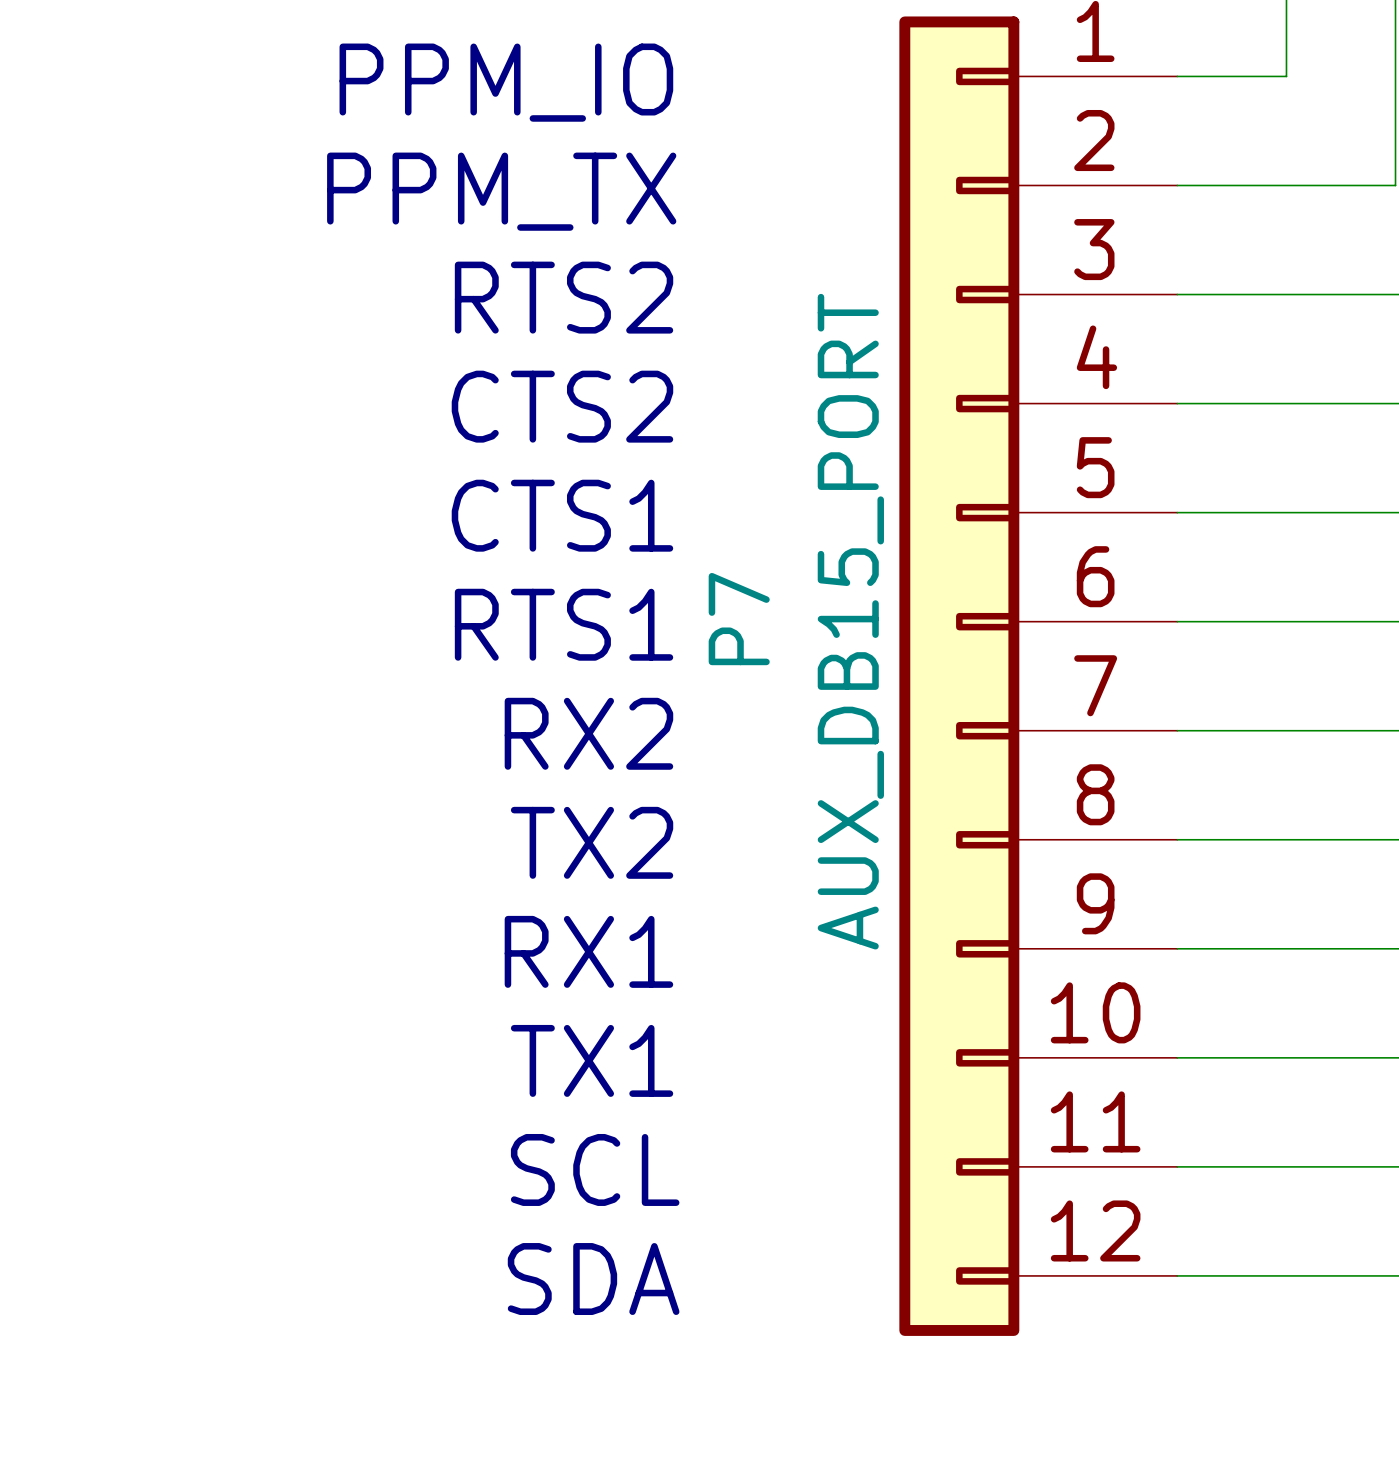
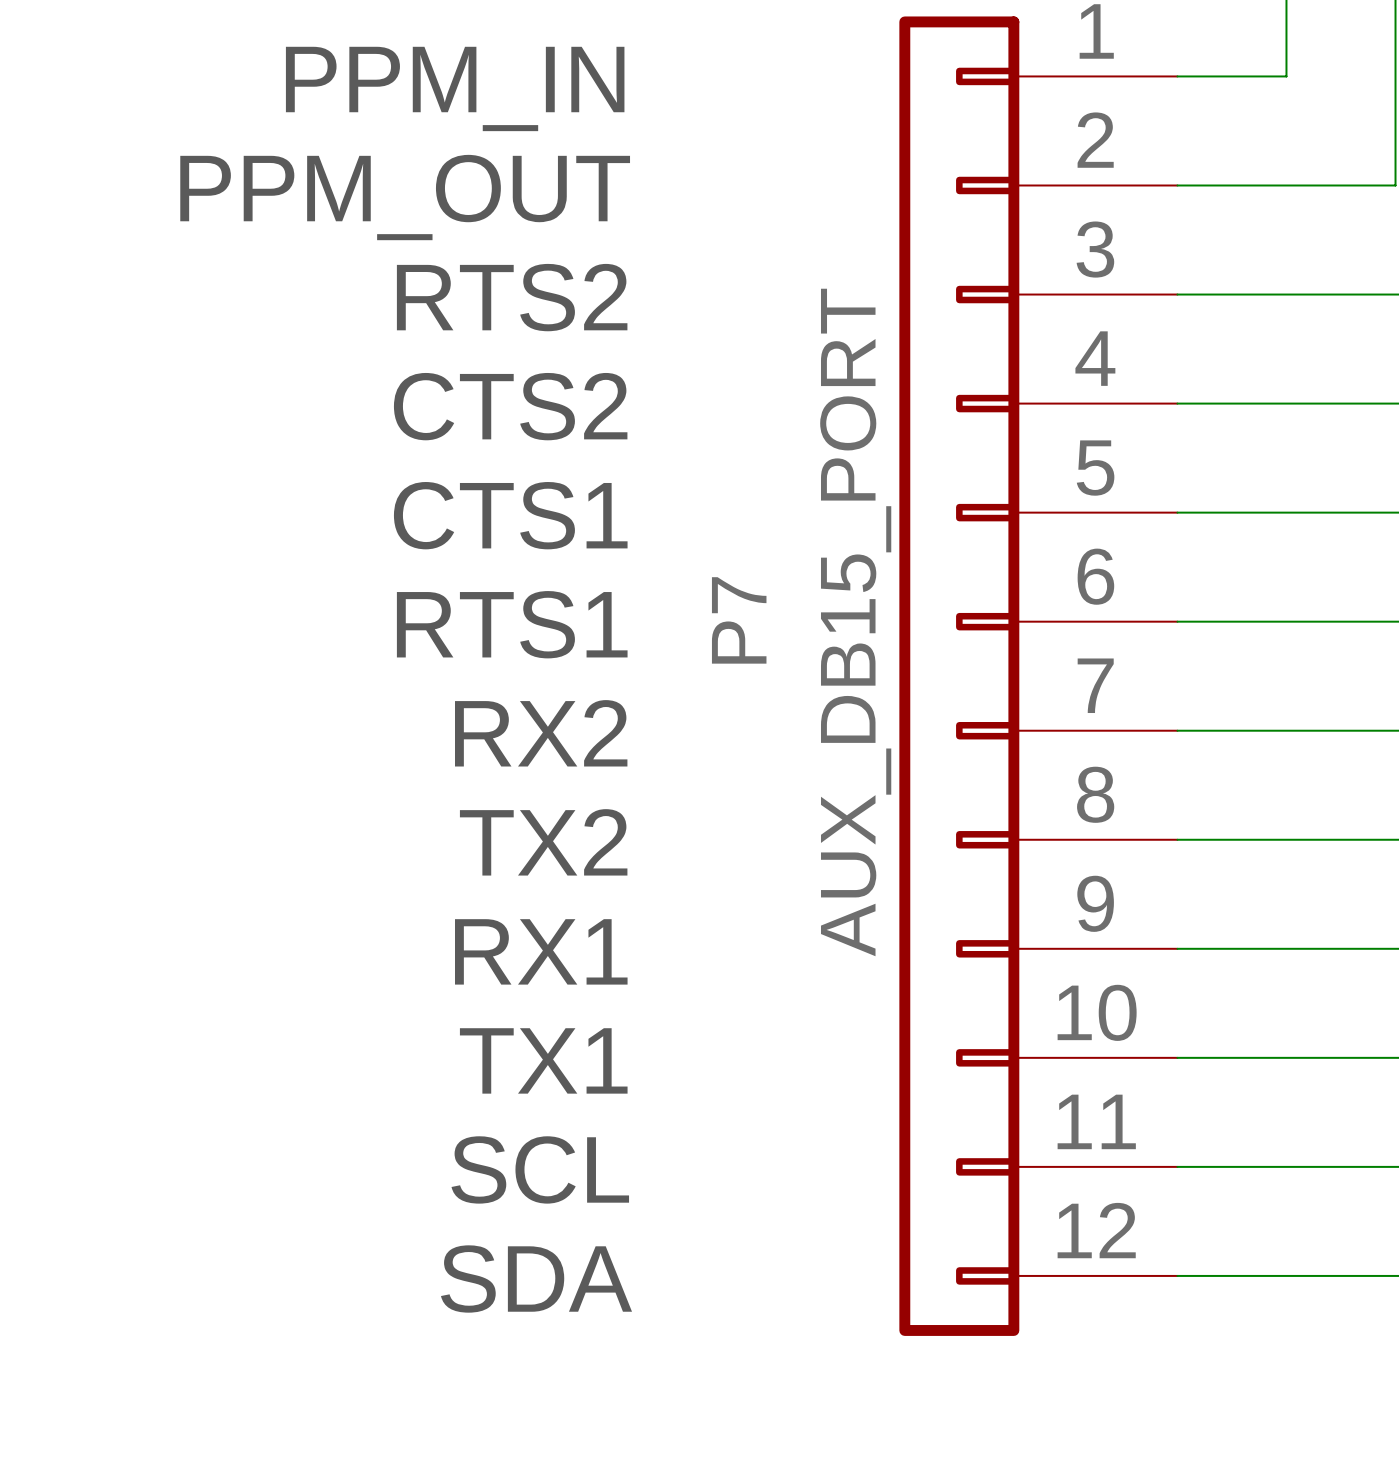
text: PPM_IO (506, 82) -> PPM_IN (455, 88)
text: PPM_TX (501, 191) -> PPM_OUT (405, 197)
text position: RTS2 (564, 297) -> RTS2 (512, 297)
text position: CTS2 (562, 406) -> CTS2 (510, 406)
text position: CTS1 (562, 515) -> CTS1 (510, 515)
text position: RTS1 (564, 624) -> RTS1 (512, 624)
text position: RX2 (588, 733) -> RX2 (541, 733)
text position: TX2 (592, 842) -> TX2 (543, 842)
text position: RX1 (588, 951) -> RX1 (541, 951)
text position: TX1 (592, 1060) -> TX1 (543, 1060)
text position: SCL (595, 1169) -> SCL (540, 1169)
text position: SDA (593, 1279) -> SDA (536, 1278)

